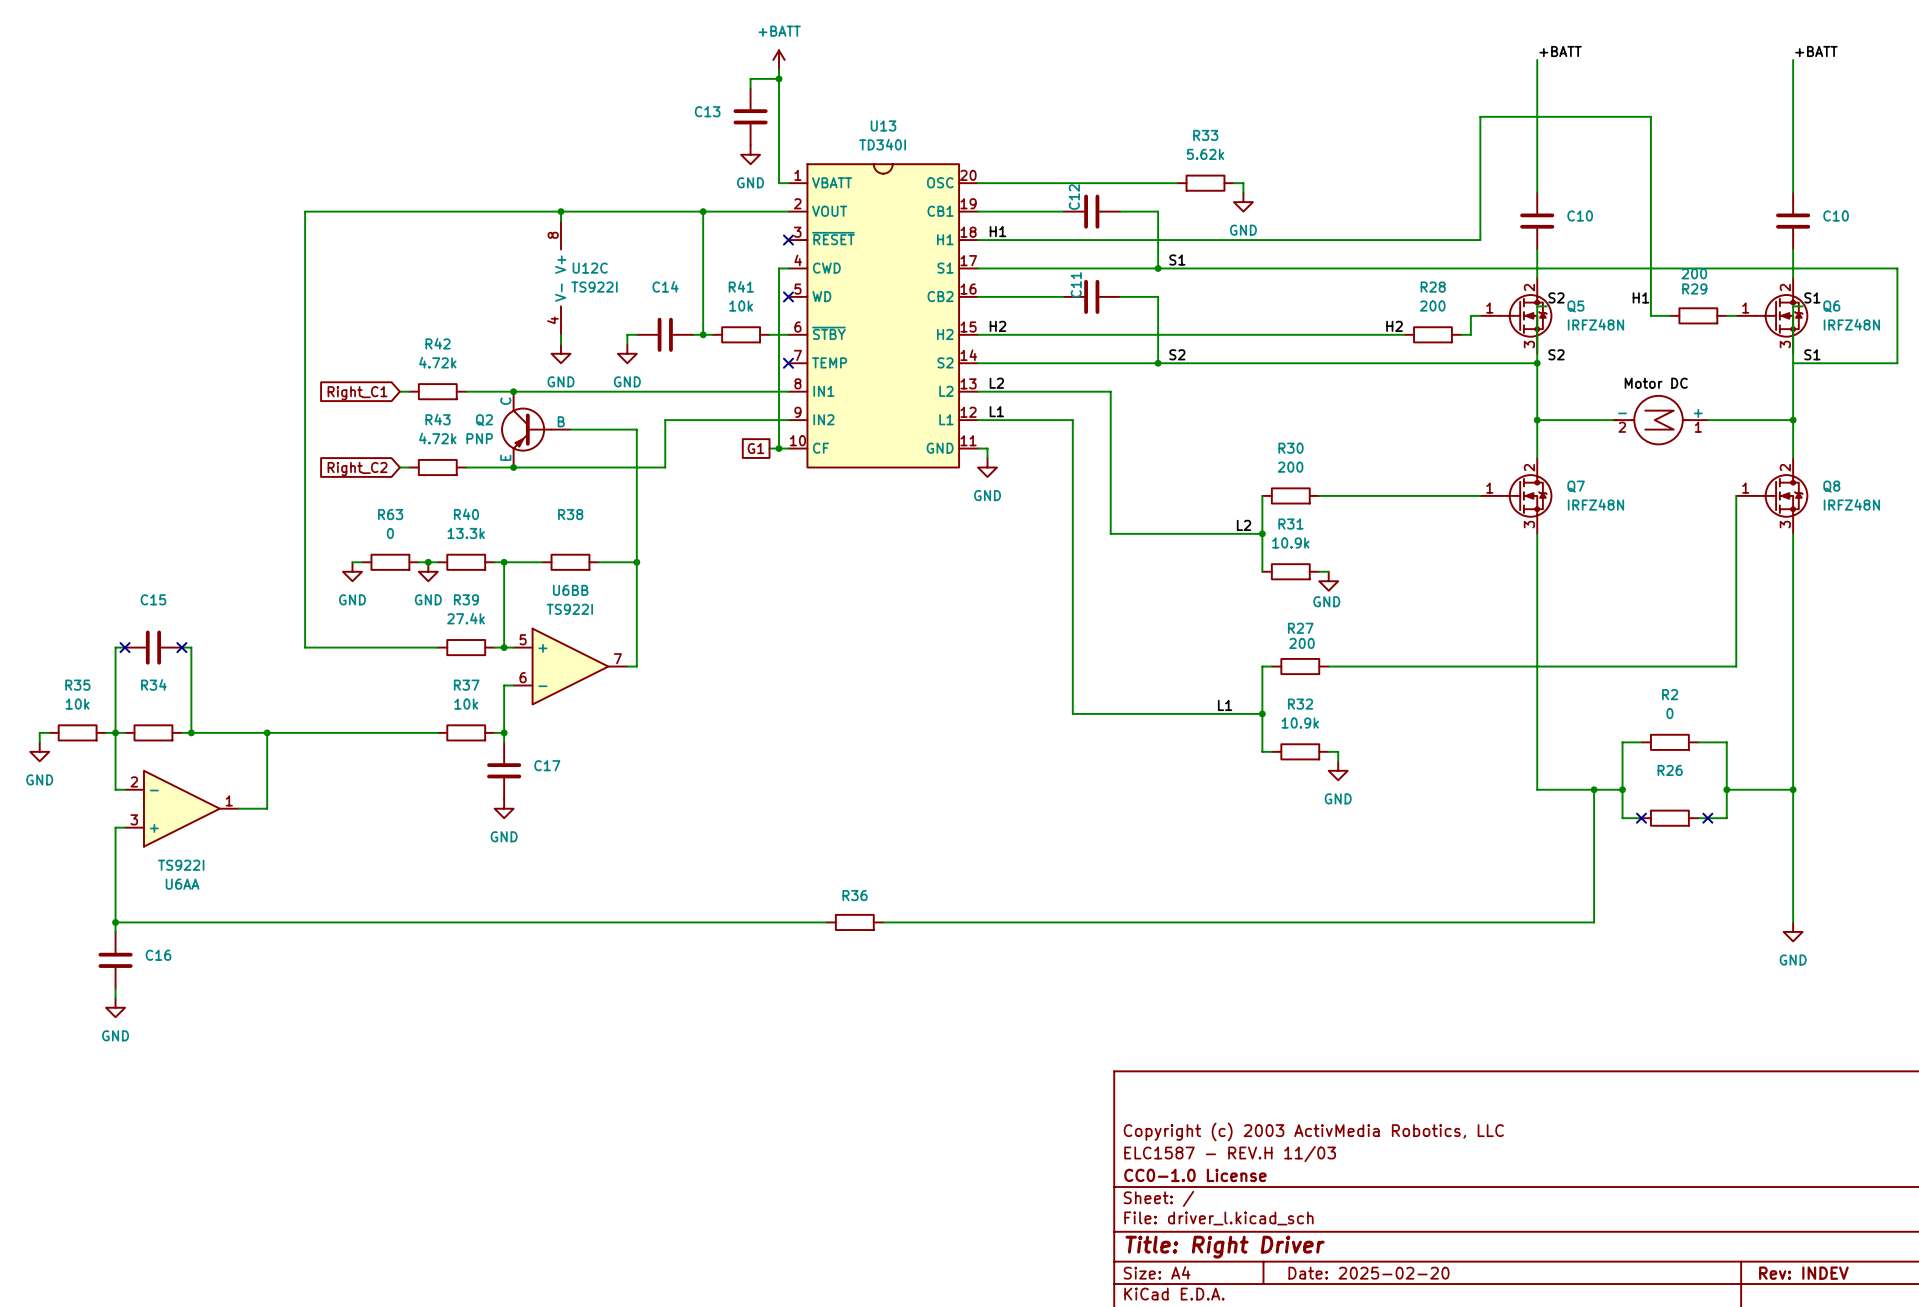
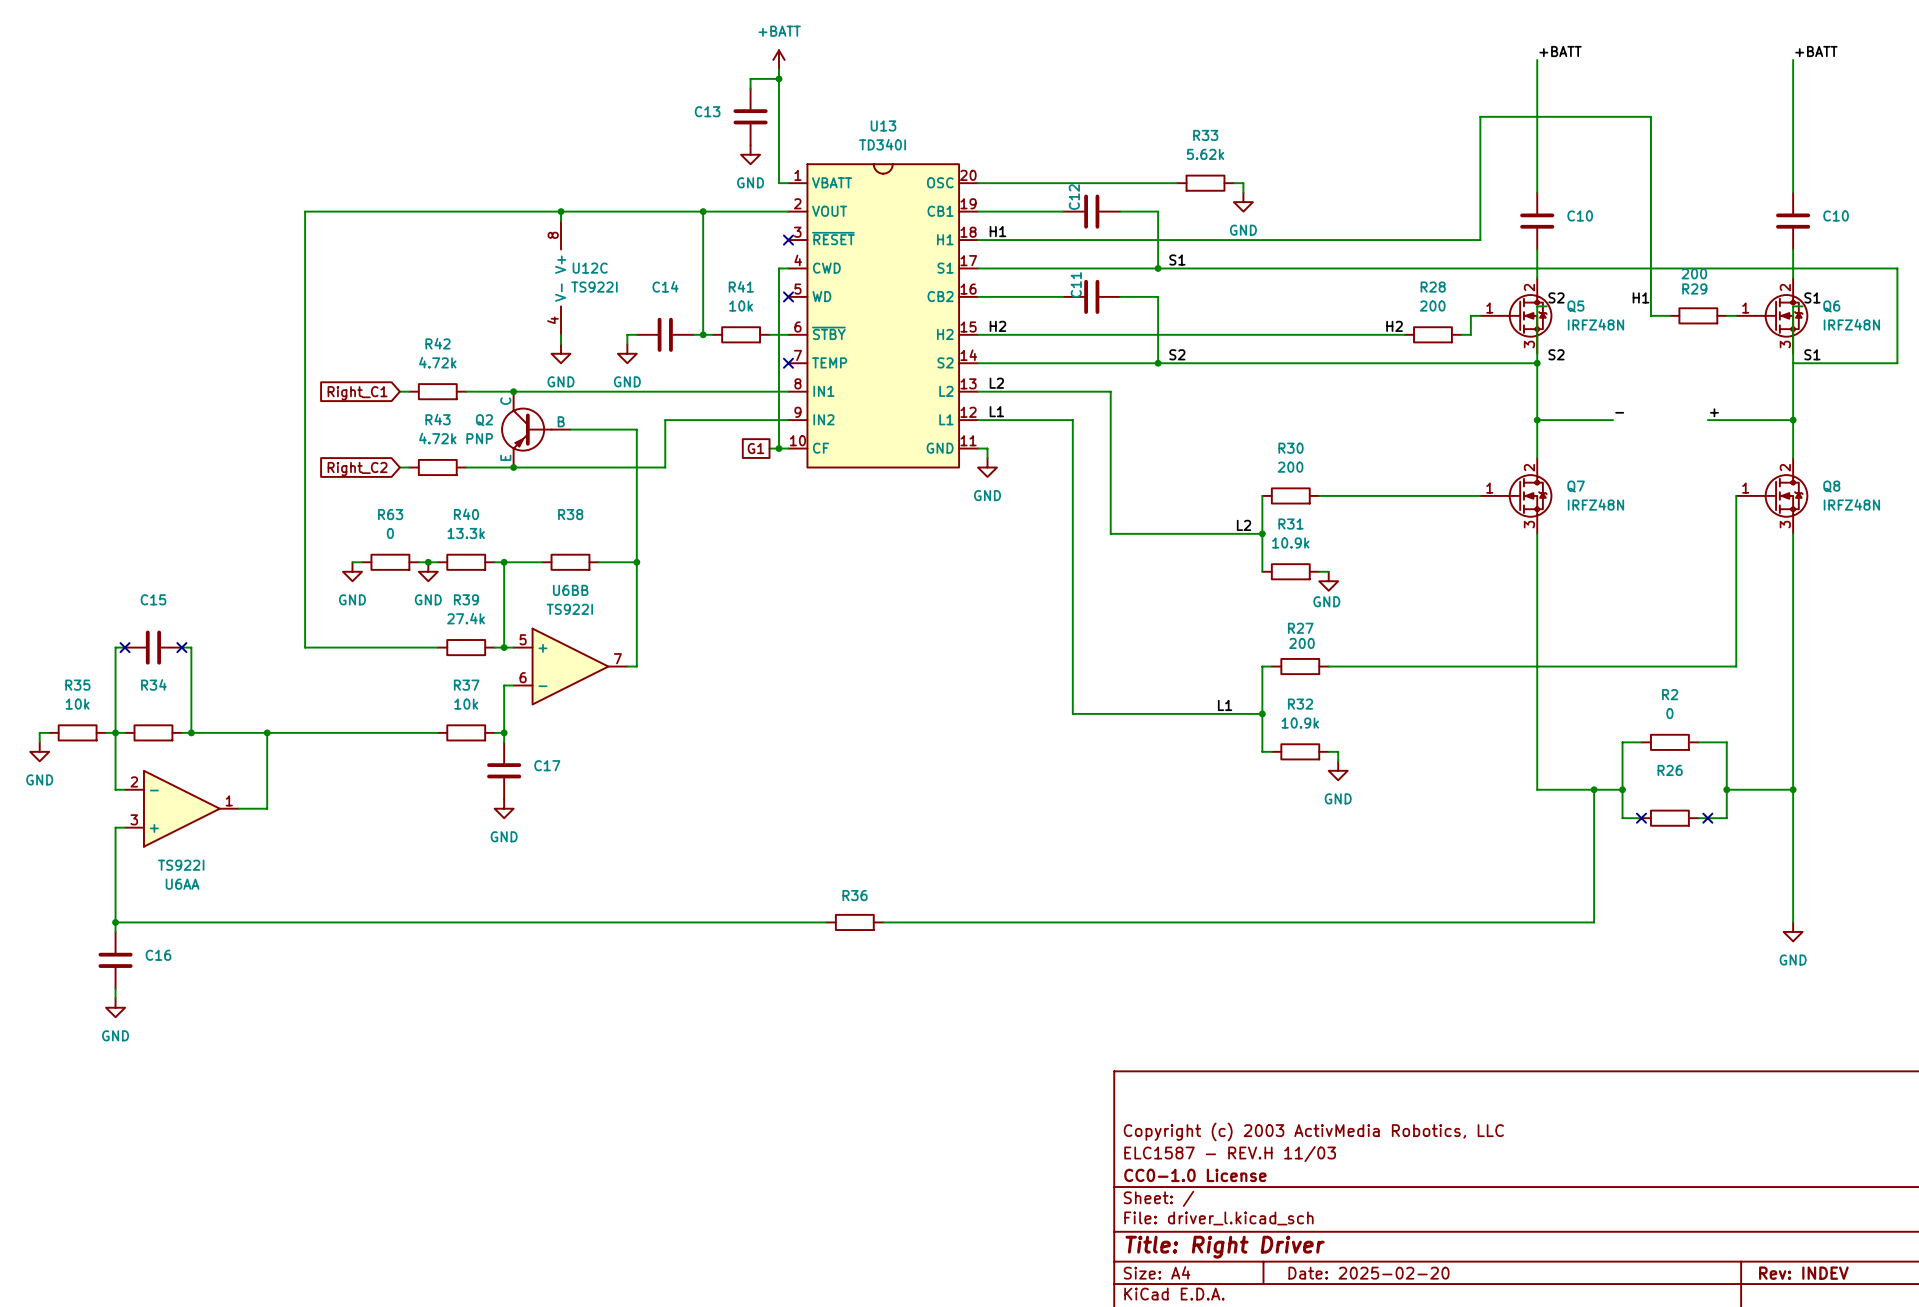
label: Motor DC (1656, 383) -> none
label: none -> - (1619, 412)
label: none -> + (1714, 412)
part: (1660, 420) -> none

